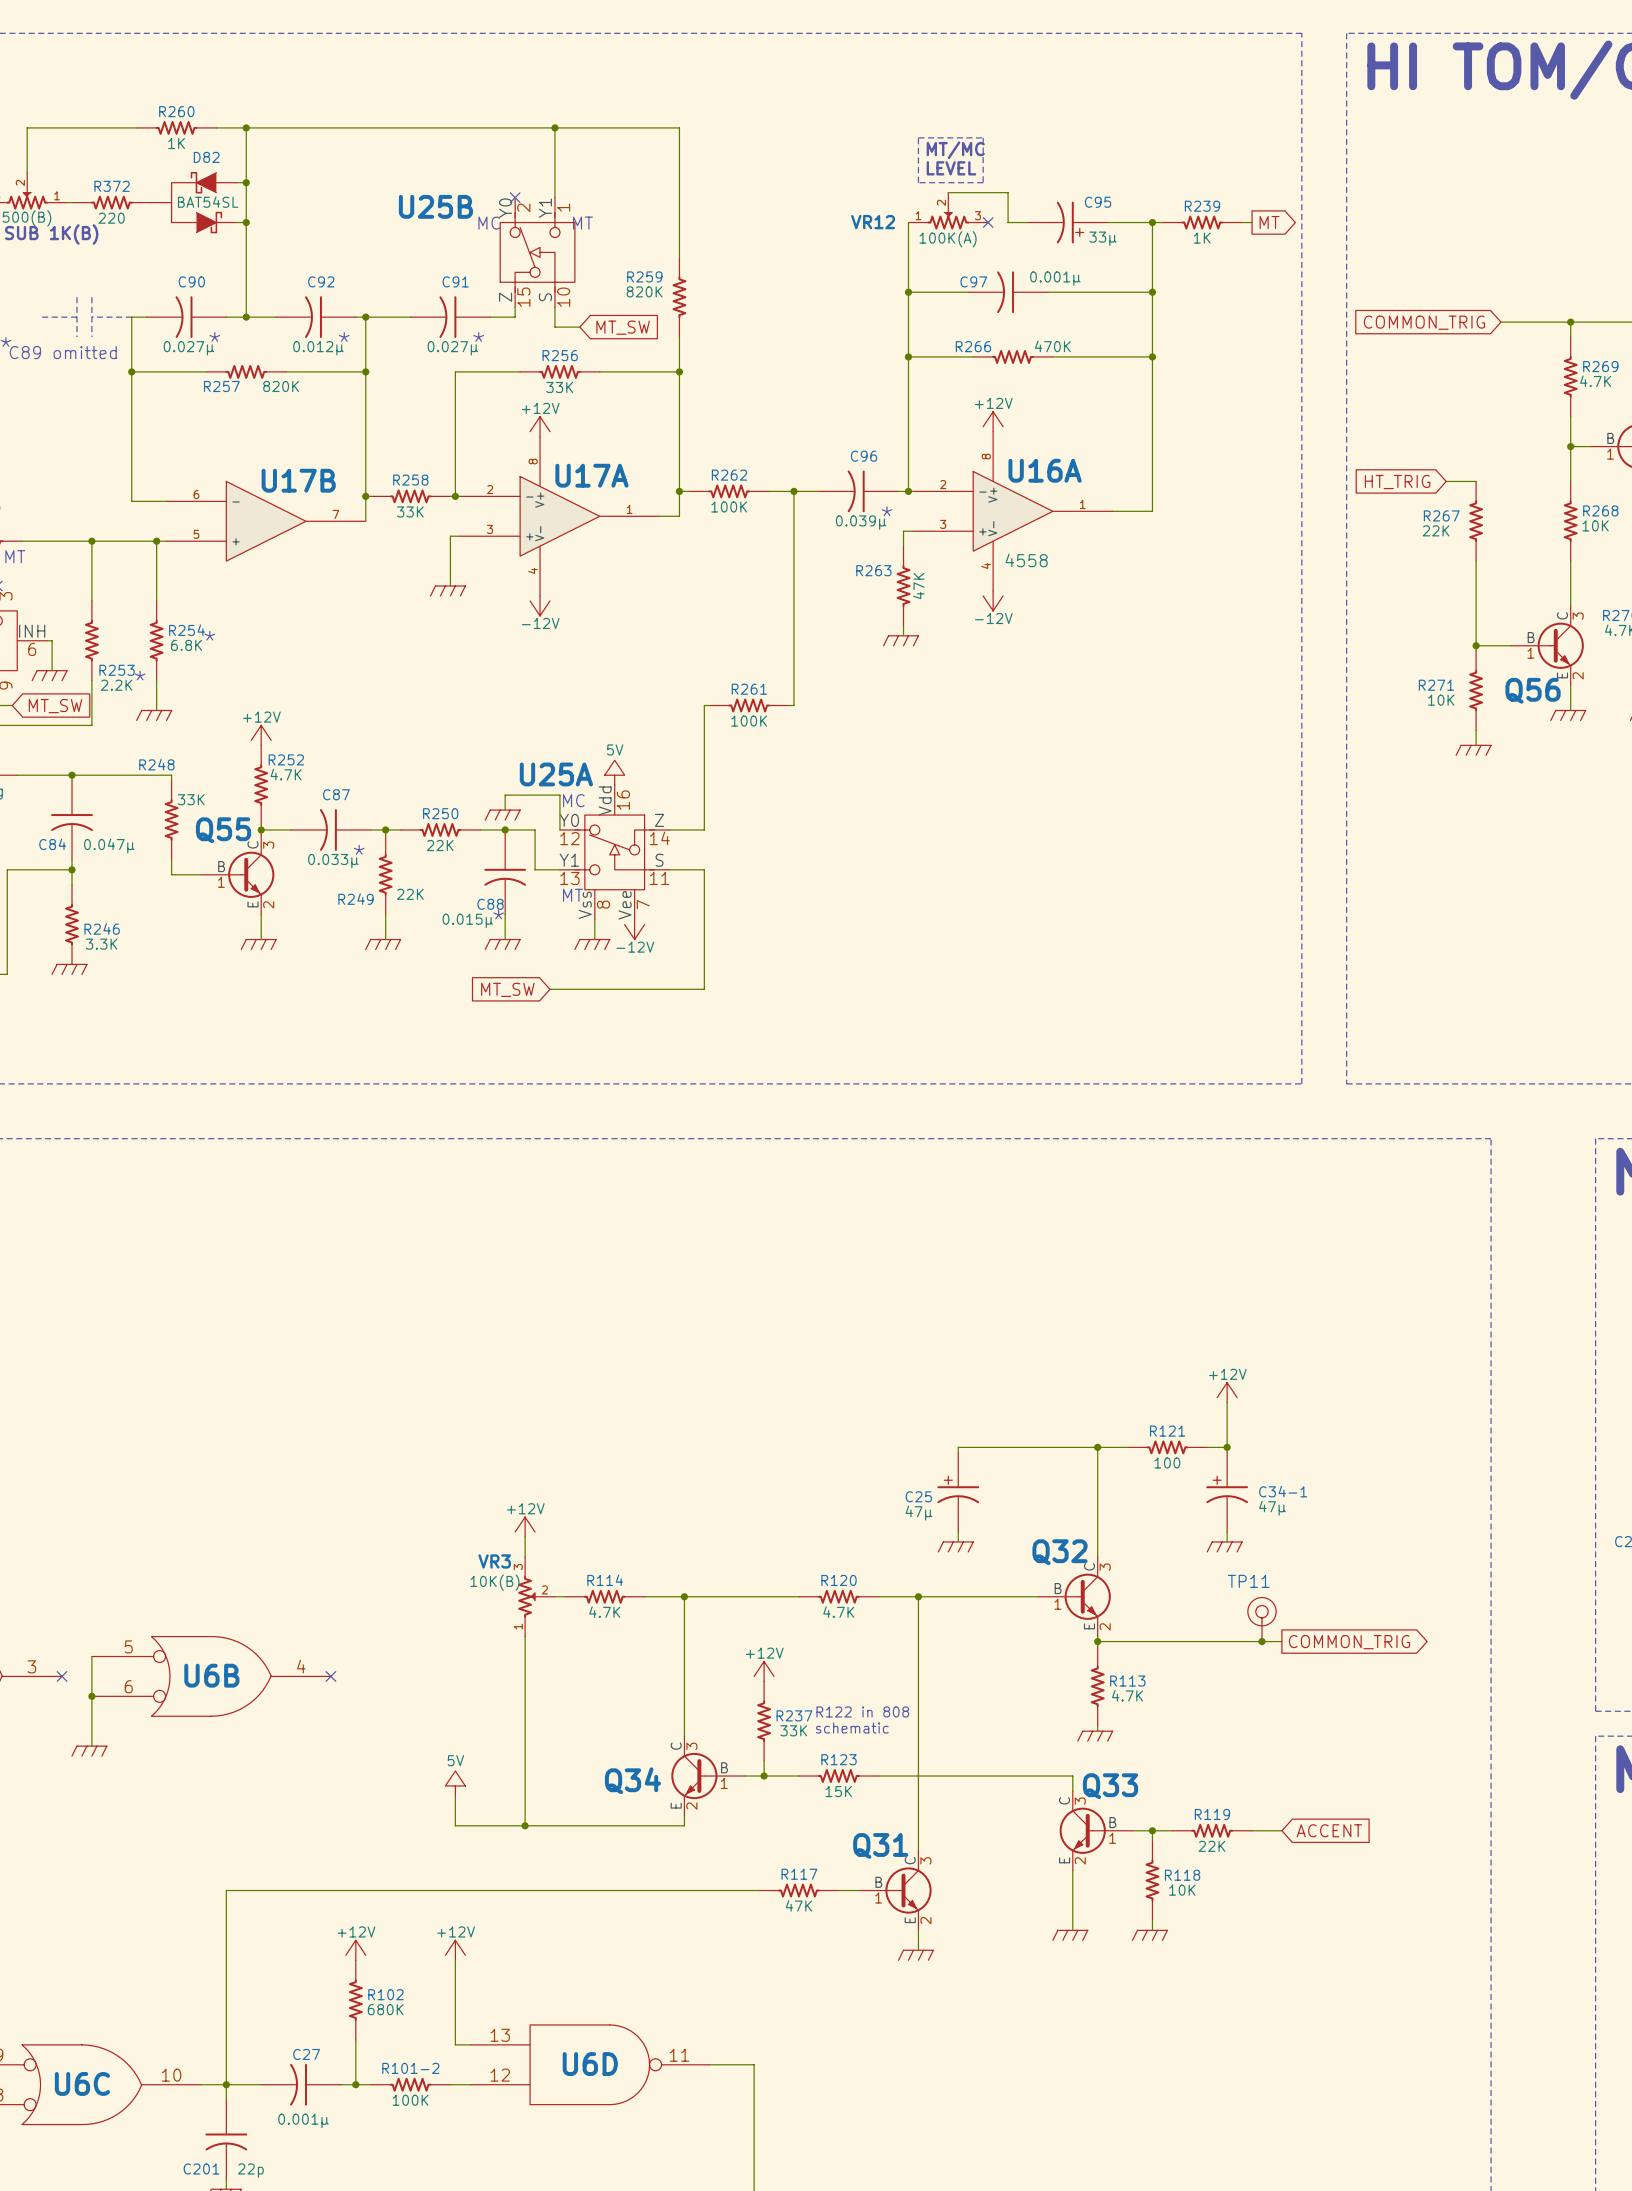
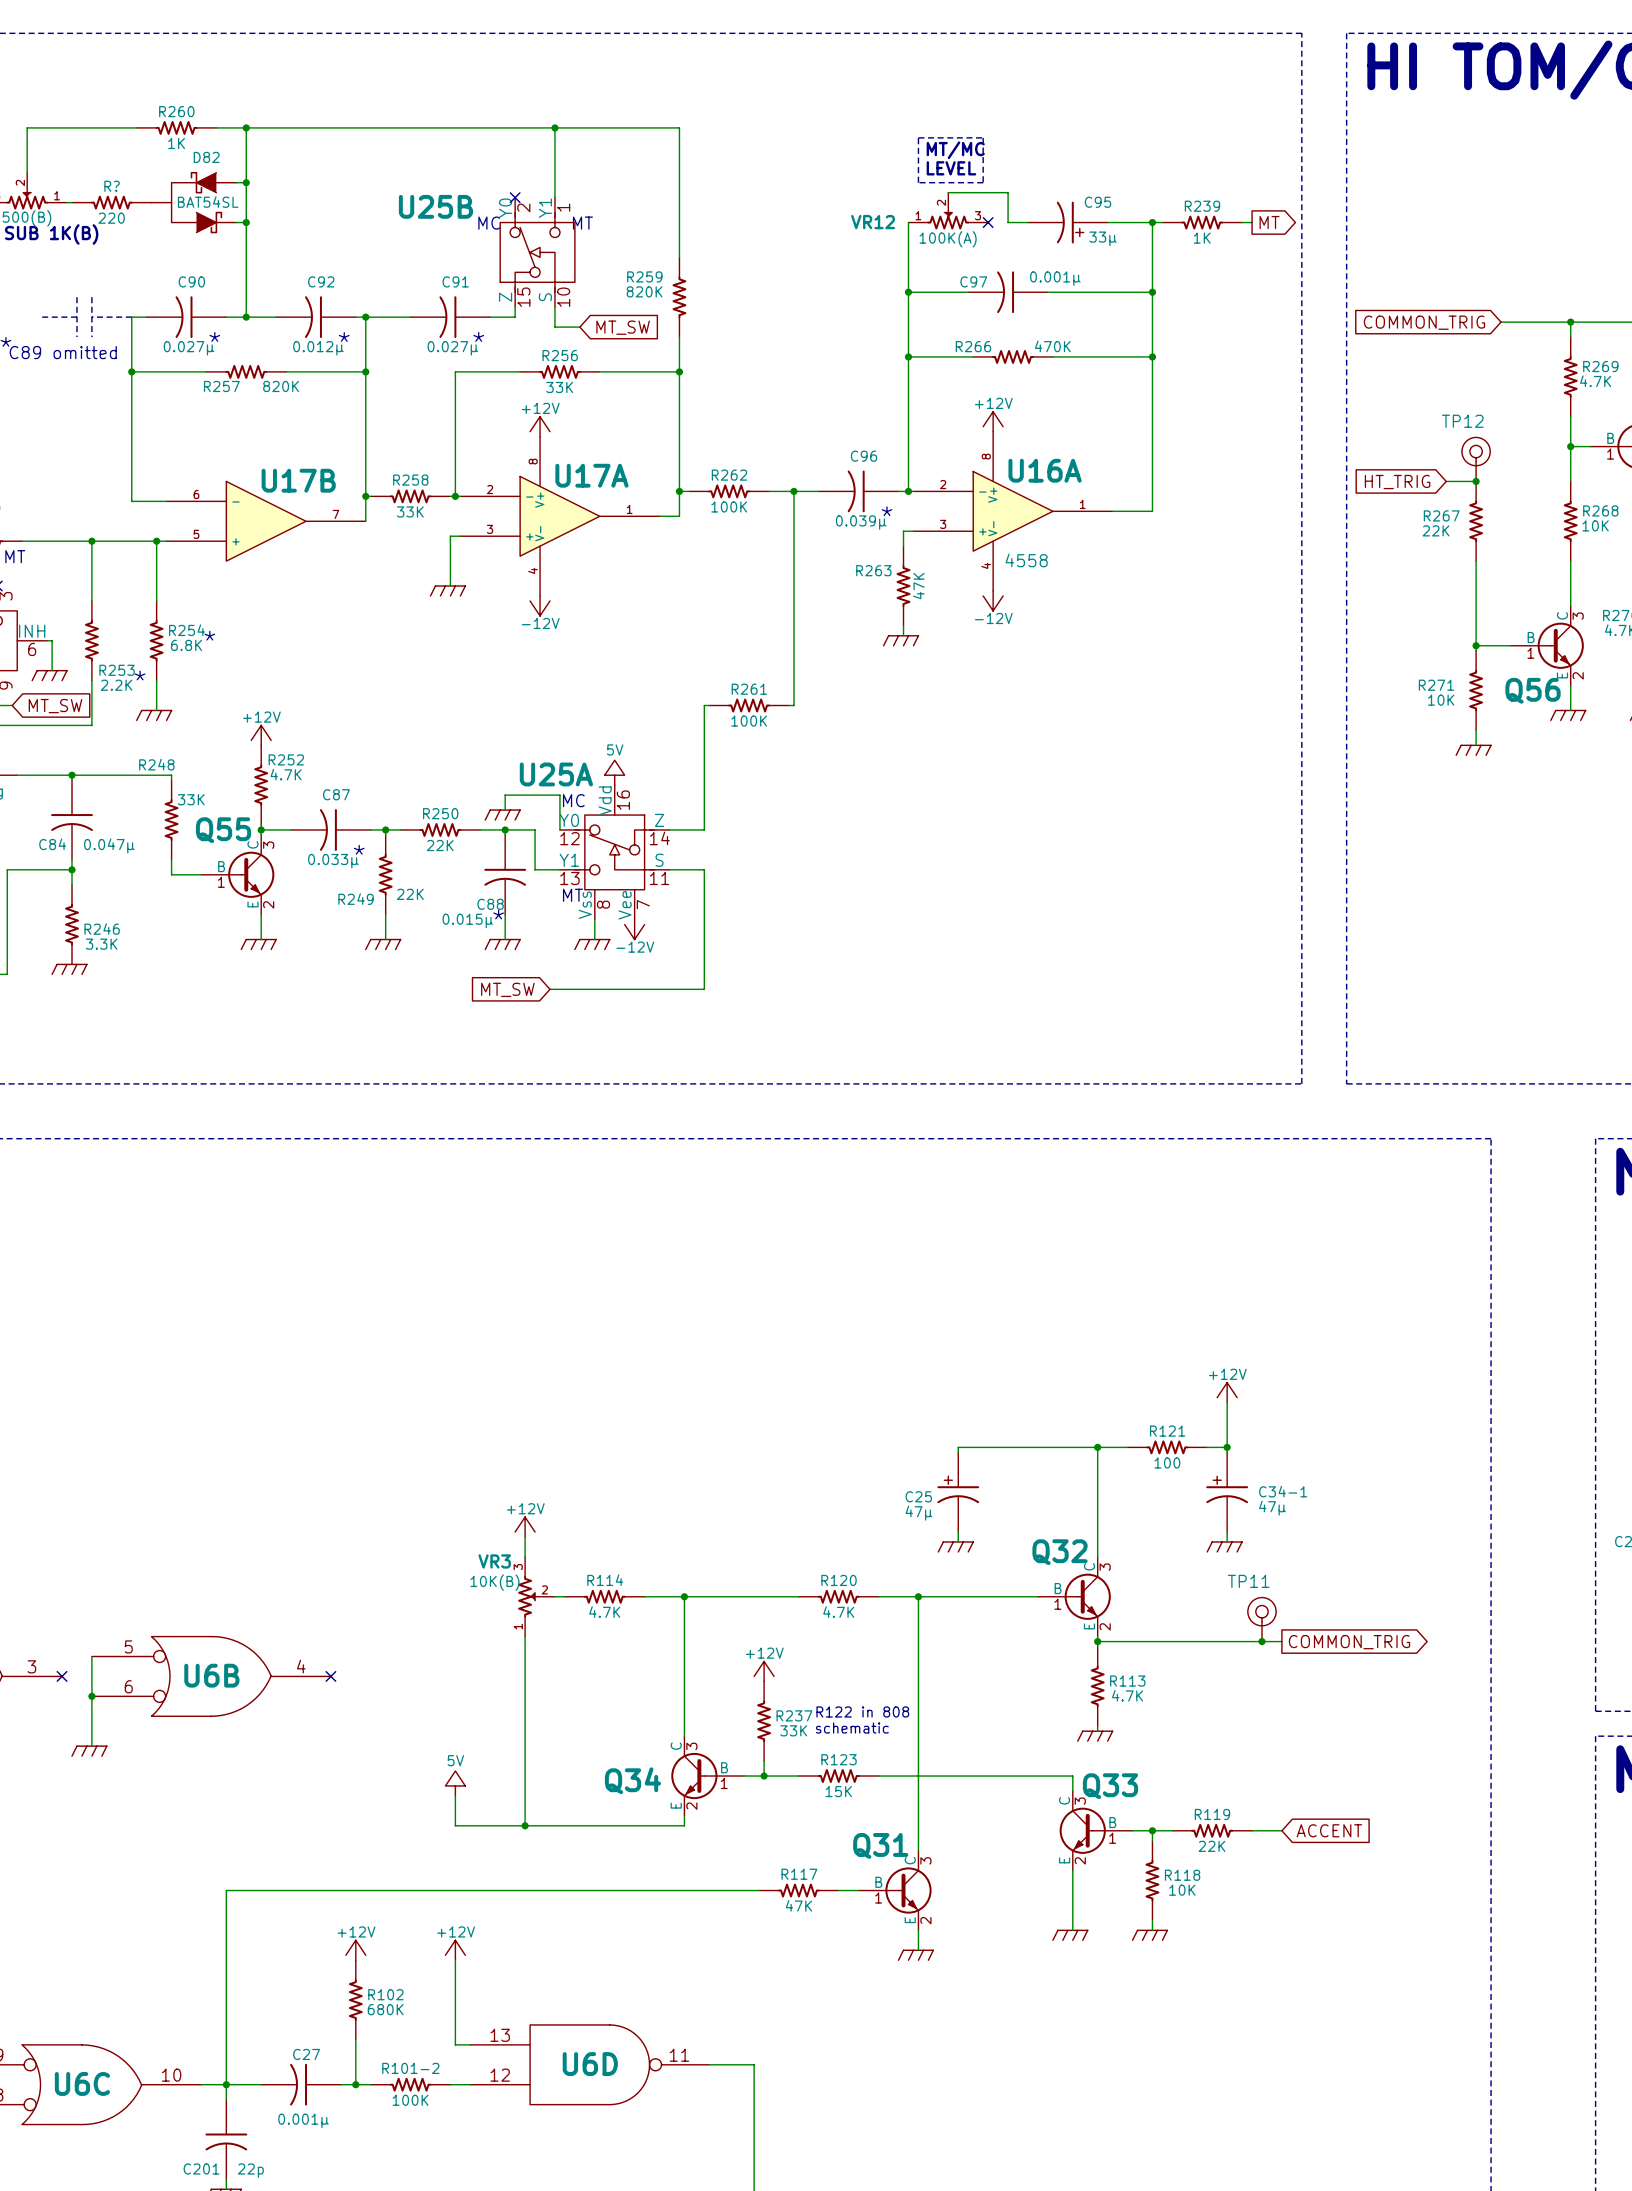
R372 name: R372 (112, 186) -> R? (112, 186)
TP12: none -> (1476, 459)
junction: none -> (1476, 481)

